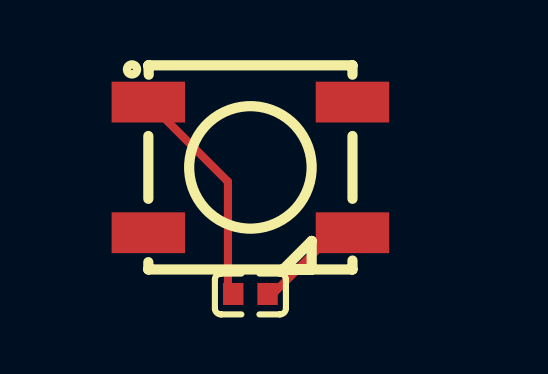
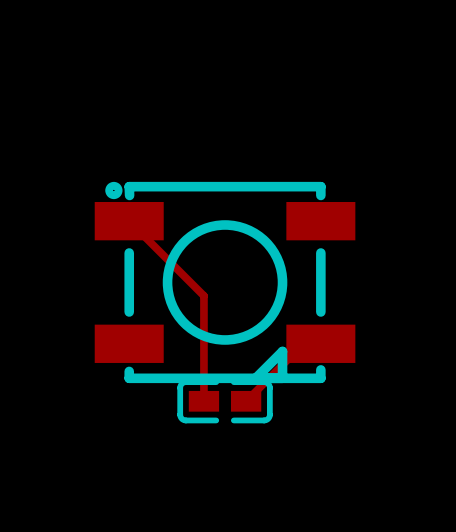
part footprint: [211, 270, 289, 318] -> [177, 379, 273, 424]

